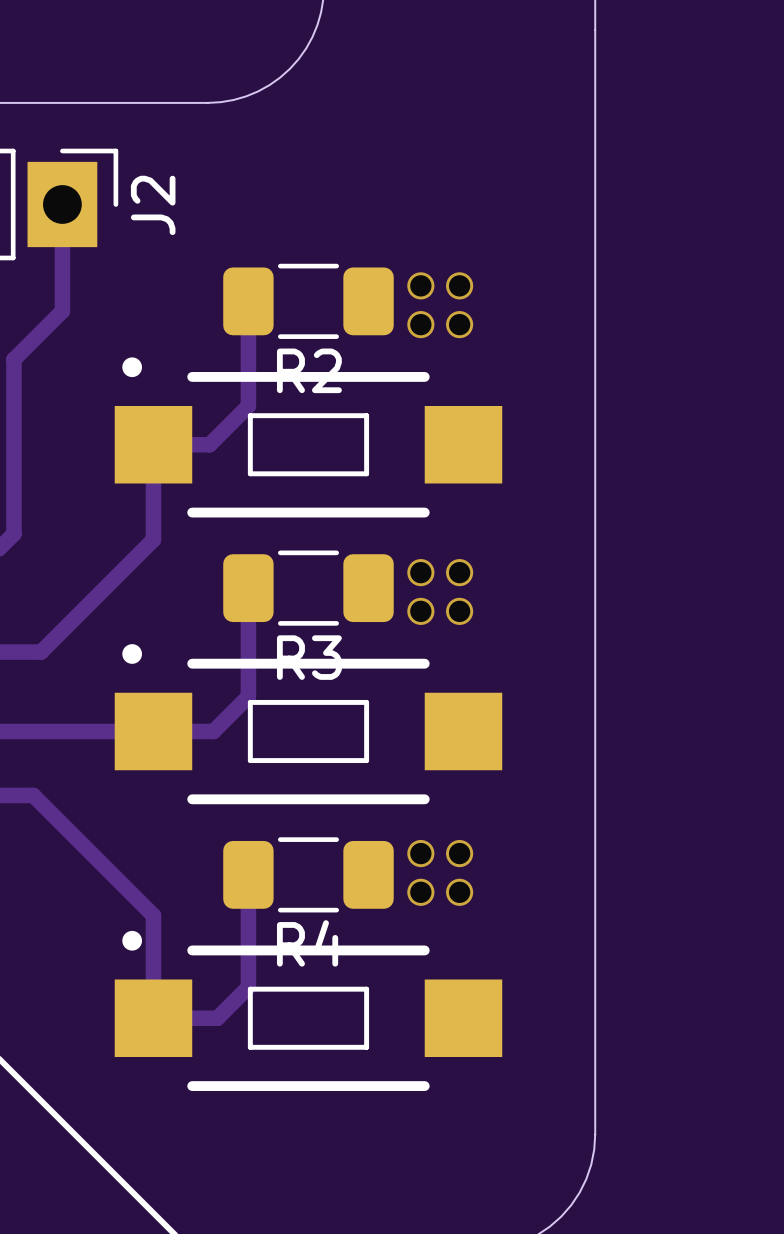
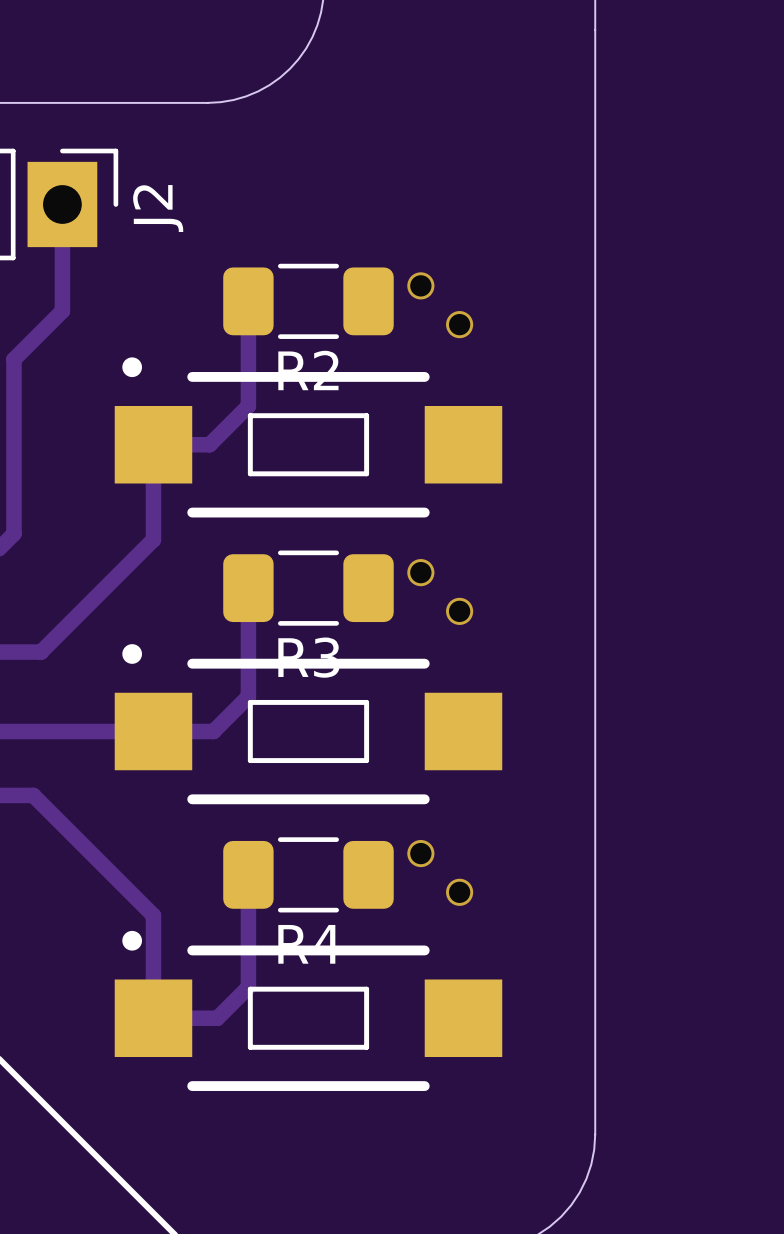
via: (459, 285) -> none
via: (420, 324) -> none
via: (459, 572) -> none
via: (420, 611) -> none
via: (459, 853) -> none
via: (420, 892) -> none

